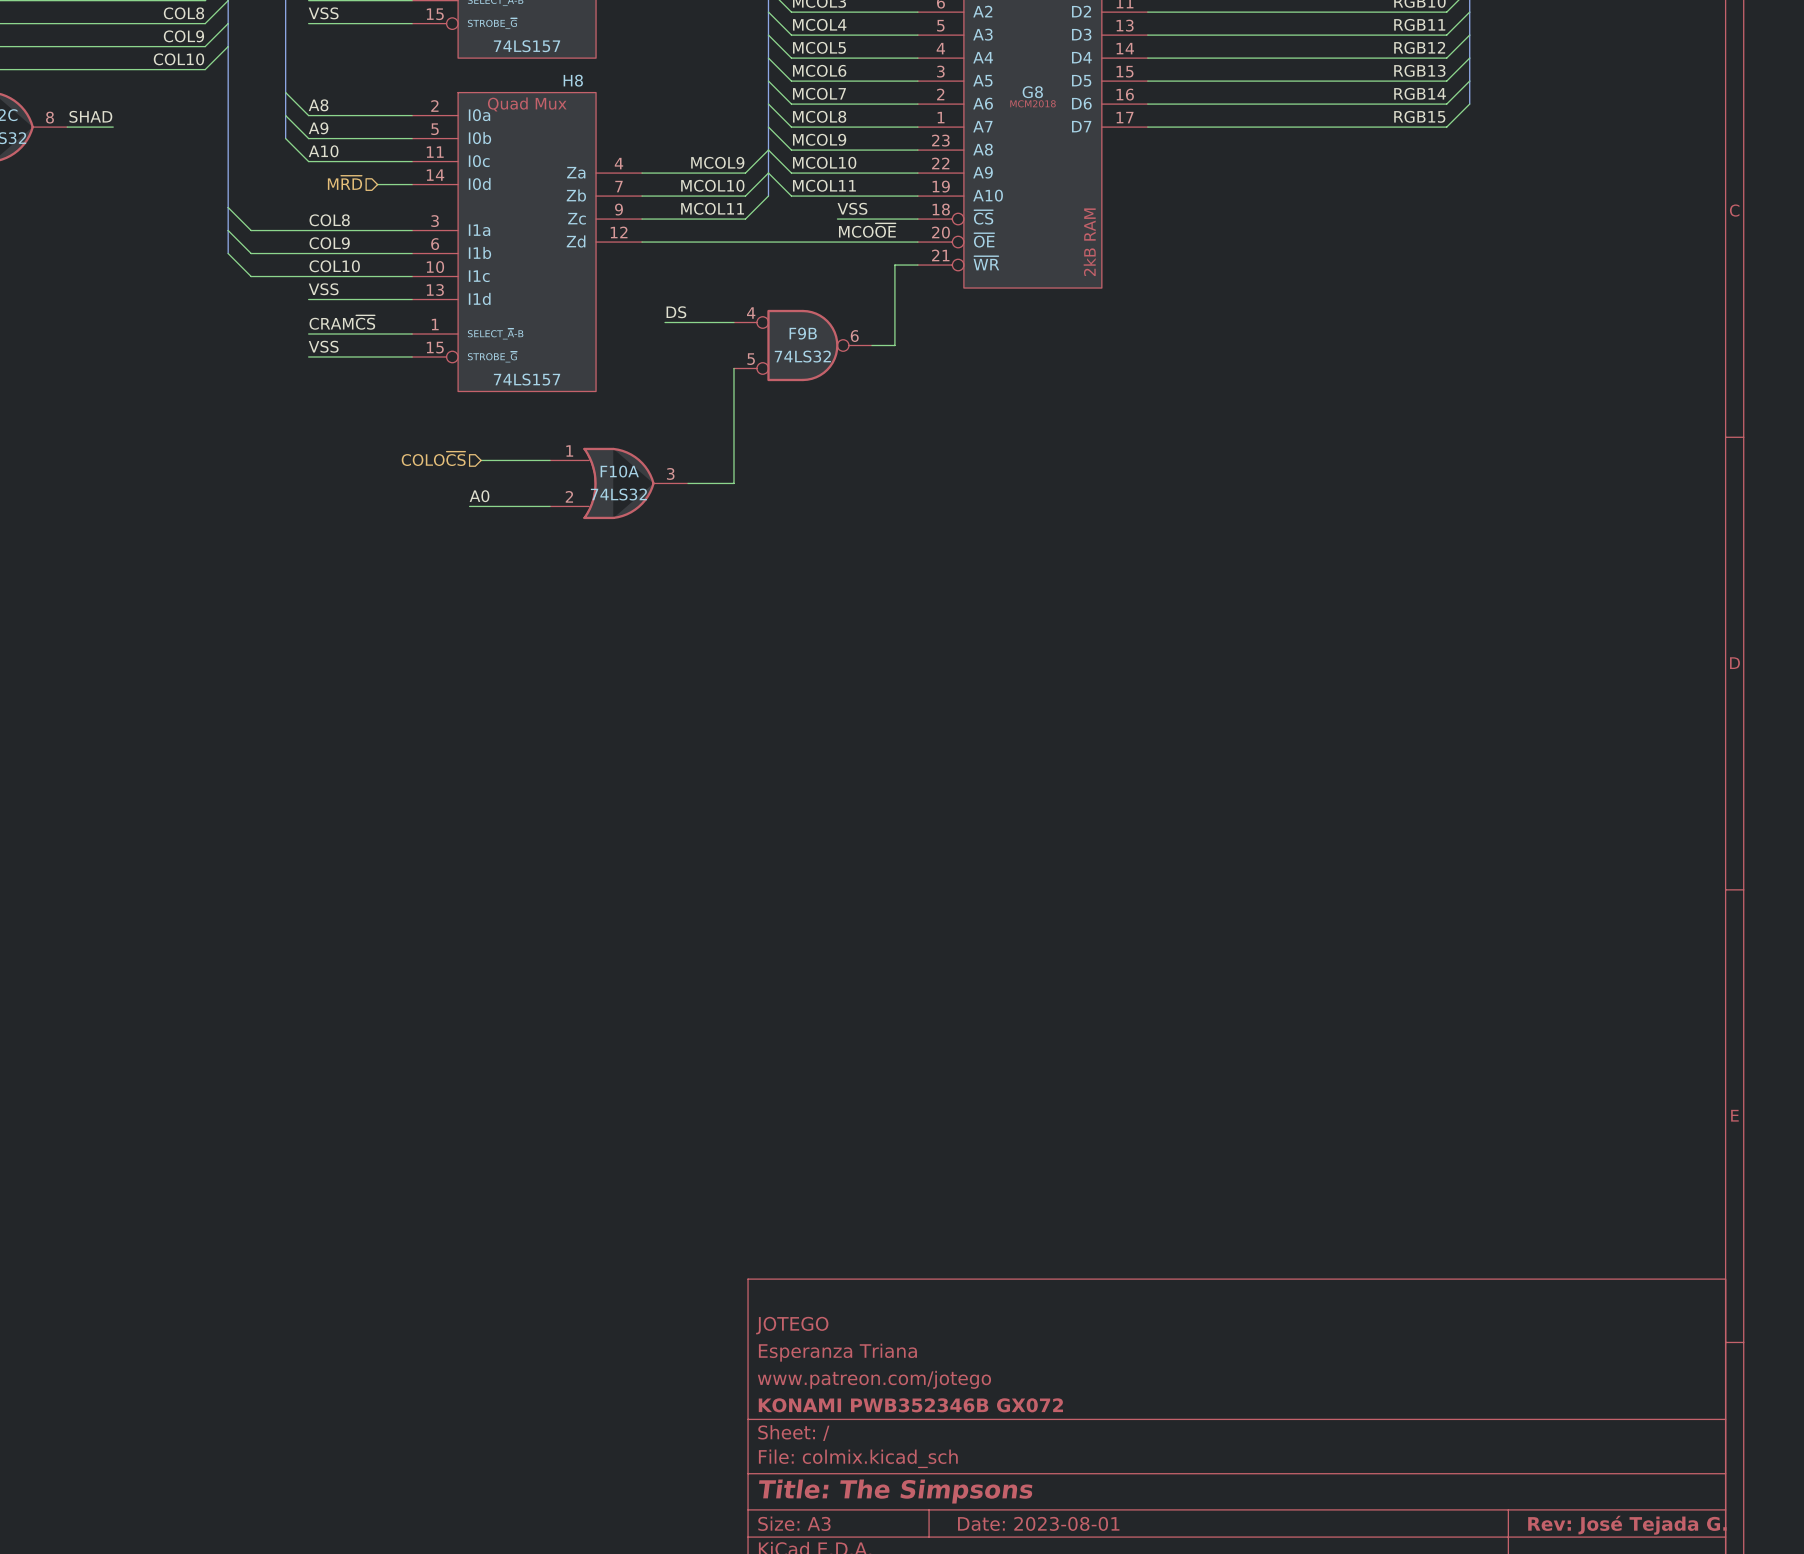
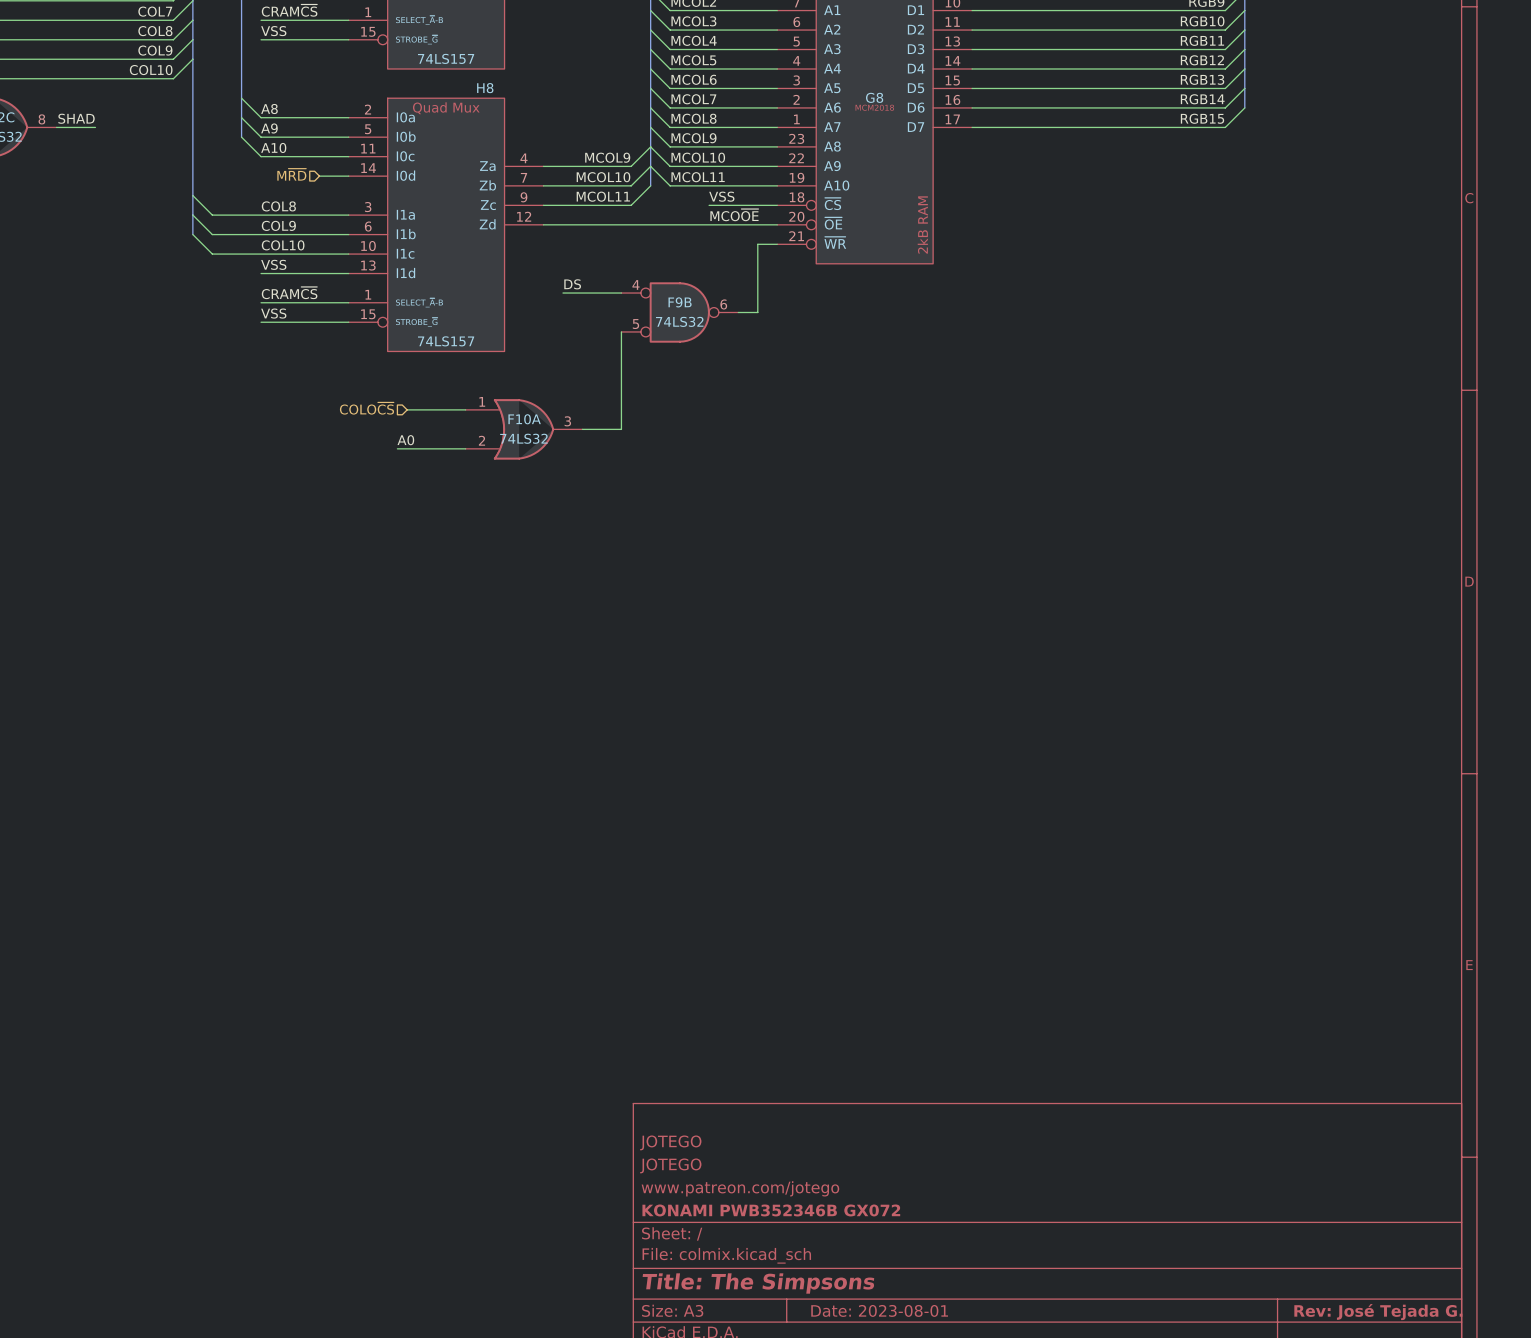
title block: Esperanza Triana (837, 1352) -> JOTEGO (670, 1165)

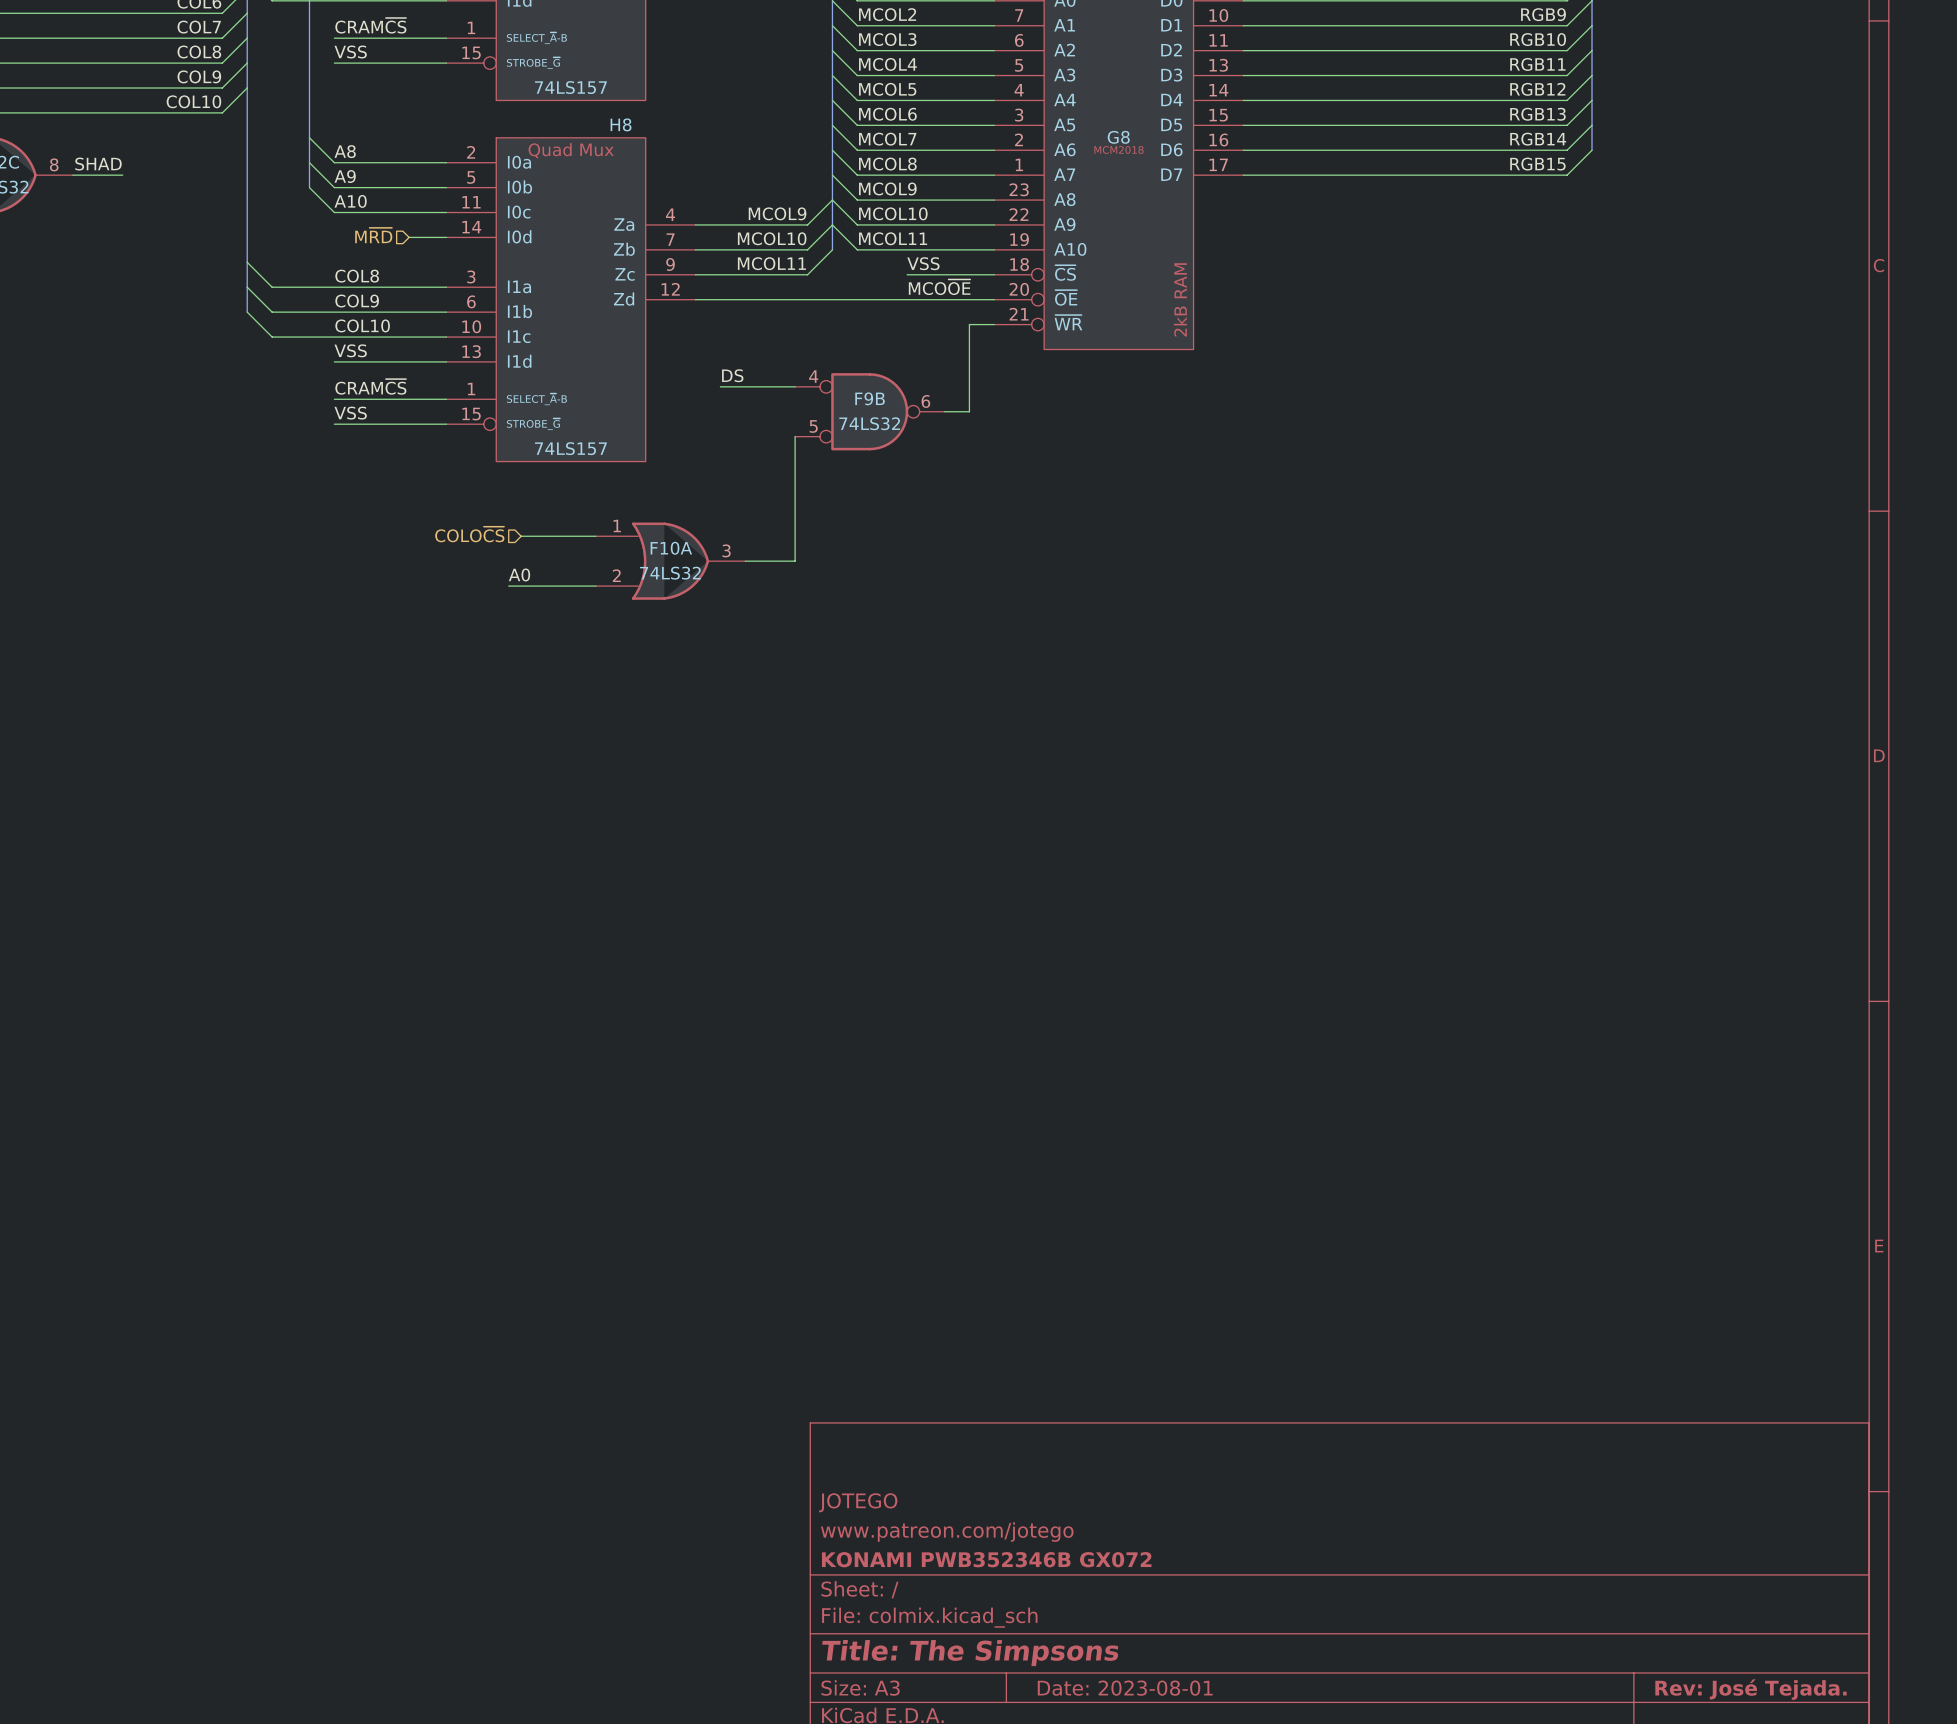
title block: JOTEGO (670, 1142) -> none
title block: Rev: José Tejada G. (1378, 1312) -> Rev: José Tejada. (1750, 1689)

